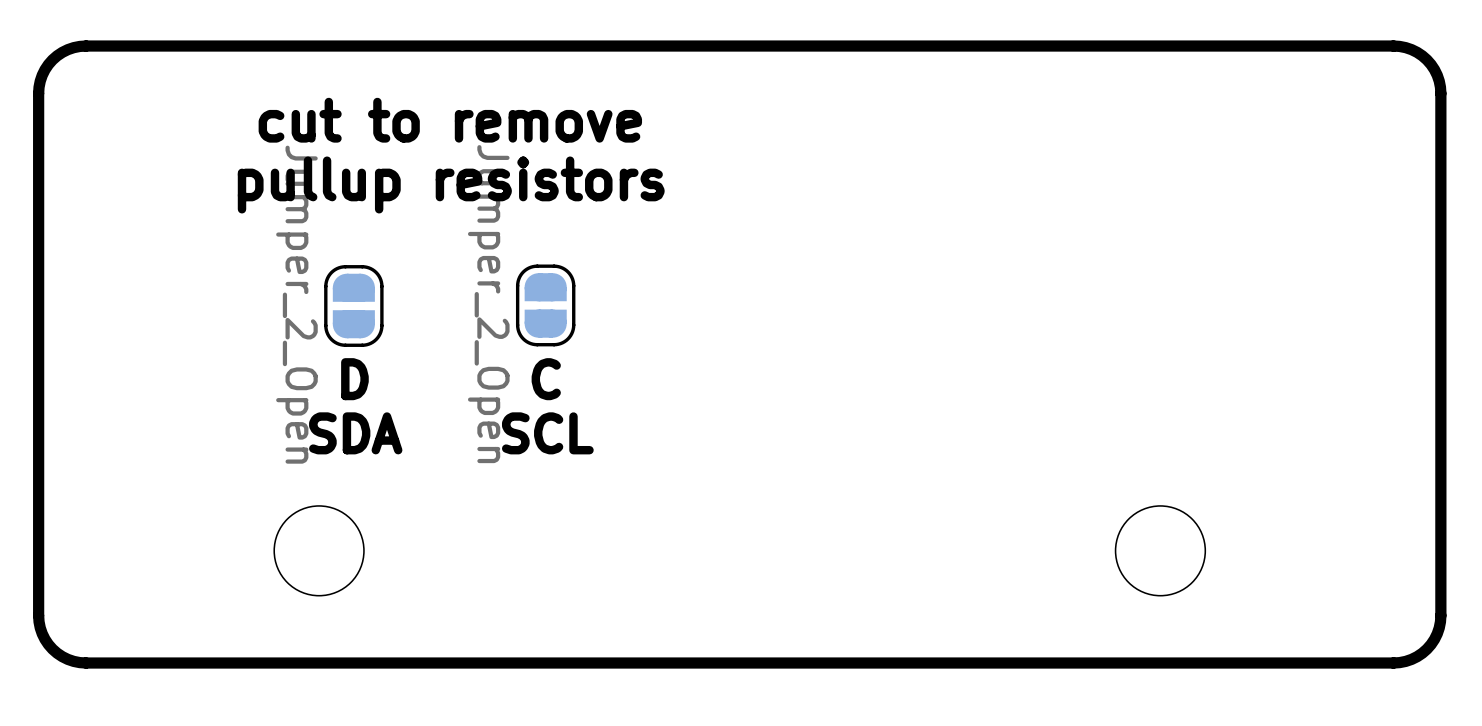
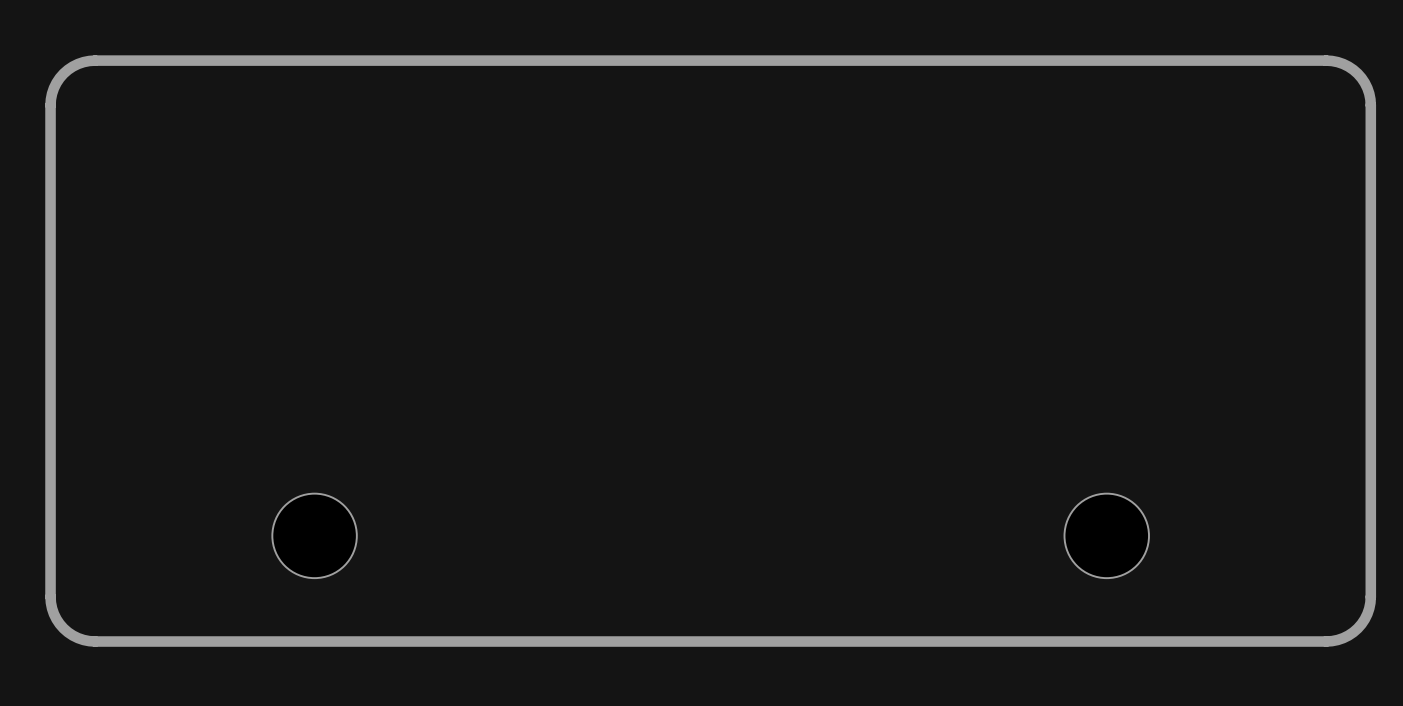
text: cut to remove (450, 120) -> none
text: pullup resistors (451, 184) -> none
part: Jumper_2_Open (545, 305) -> none
part: Jumper_2_Open (353, 306) -> none
text: D (354, 379) -> none
text: C (546, 379) -> none
text: SDA (355, 433) -> none
text: SCL (547, 433) -> none

